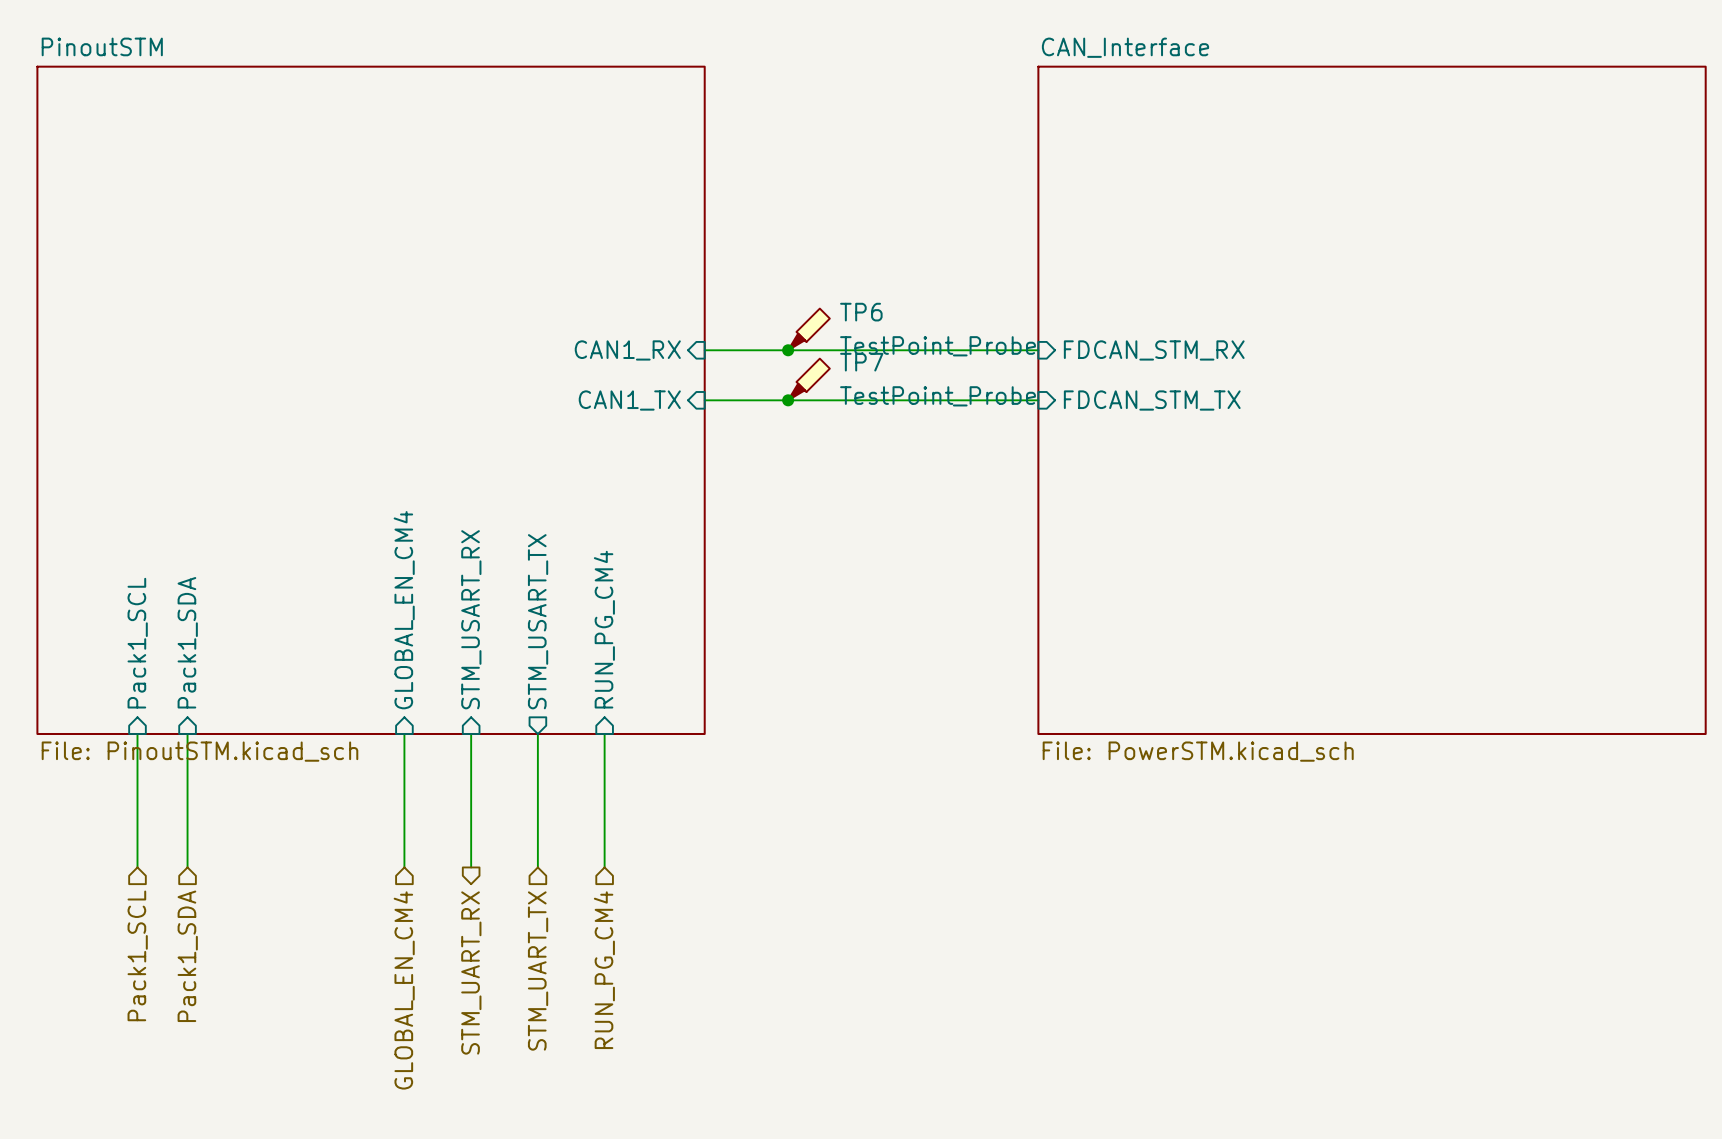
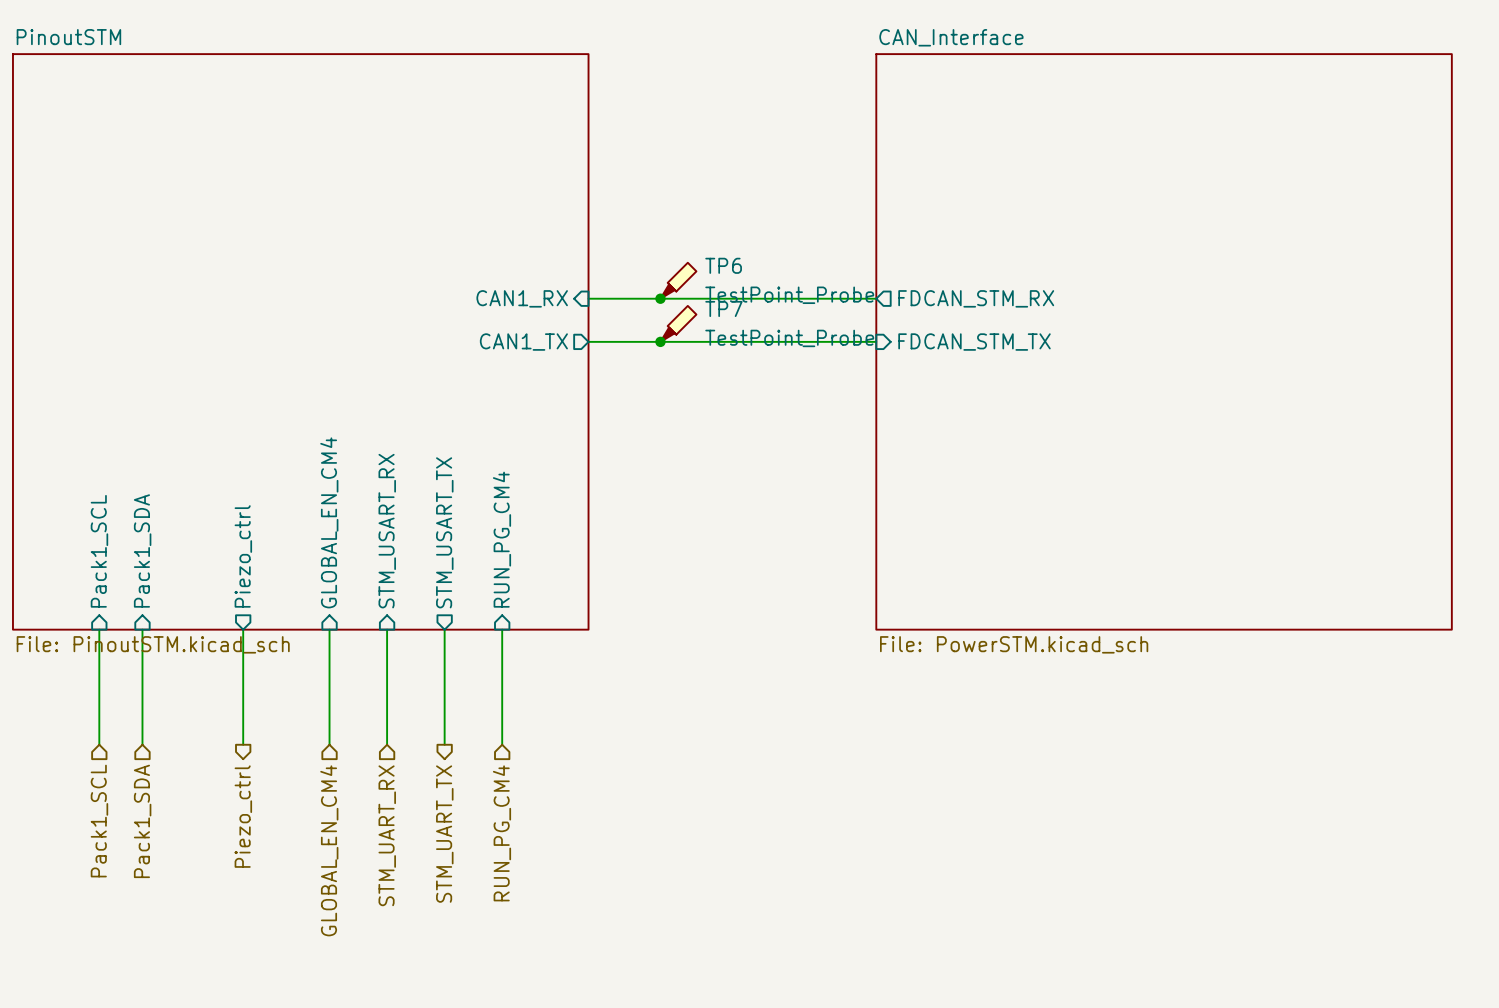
sheet pin shape: input (1154, 350) -> output (976, 298)
sheet pin shape: input (629, 400) -> output (523, 342)
sheet pin: none -> Piezo_ctrl (243, 556)
wire: none -> (243, 629) (243, 744)
hierarchical label: none -> Piezo_ctrl (243, 816)
hierarchical label shape: input (538, 970) -> output (444, 834)
hierarchical label shape: output (471, 972) -> input (387, 835)

